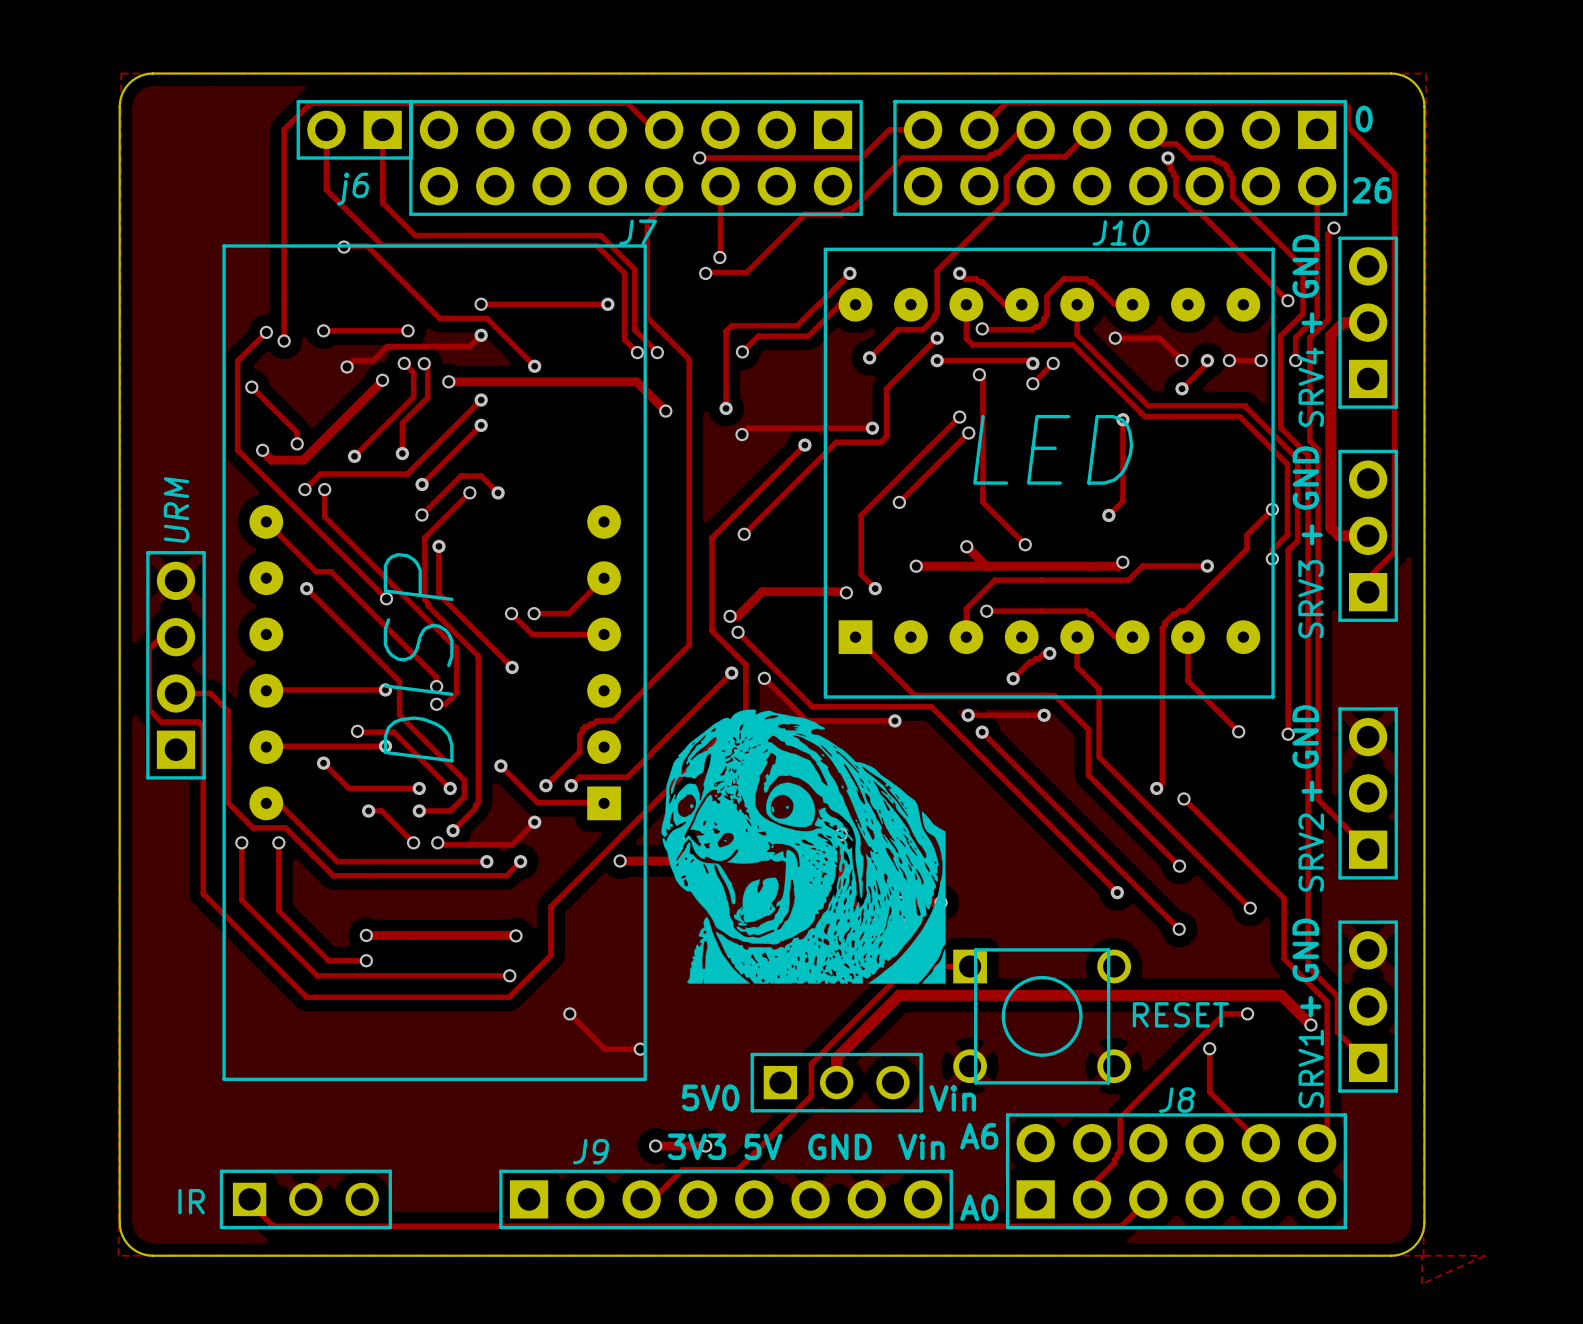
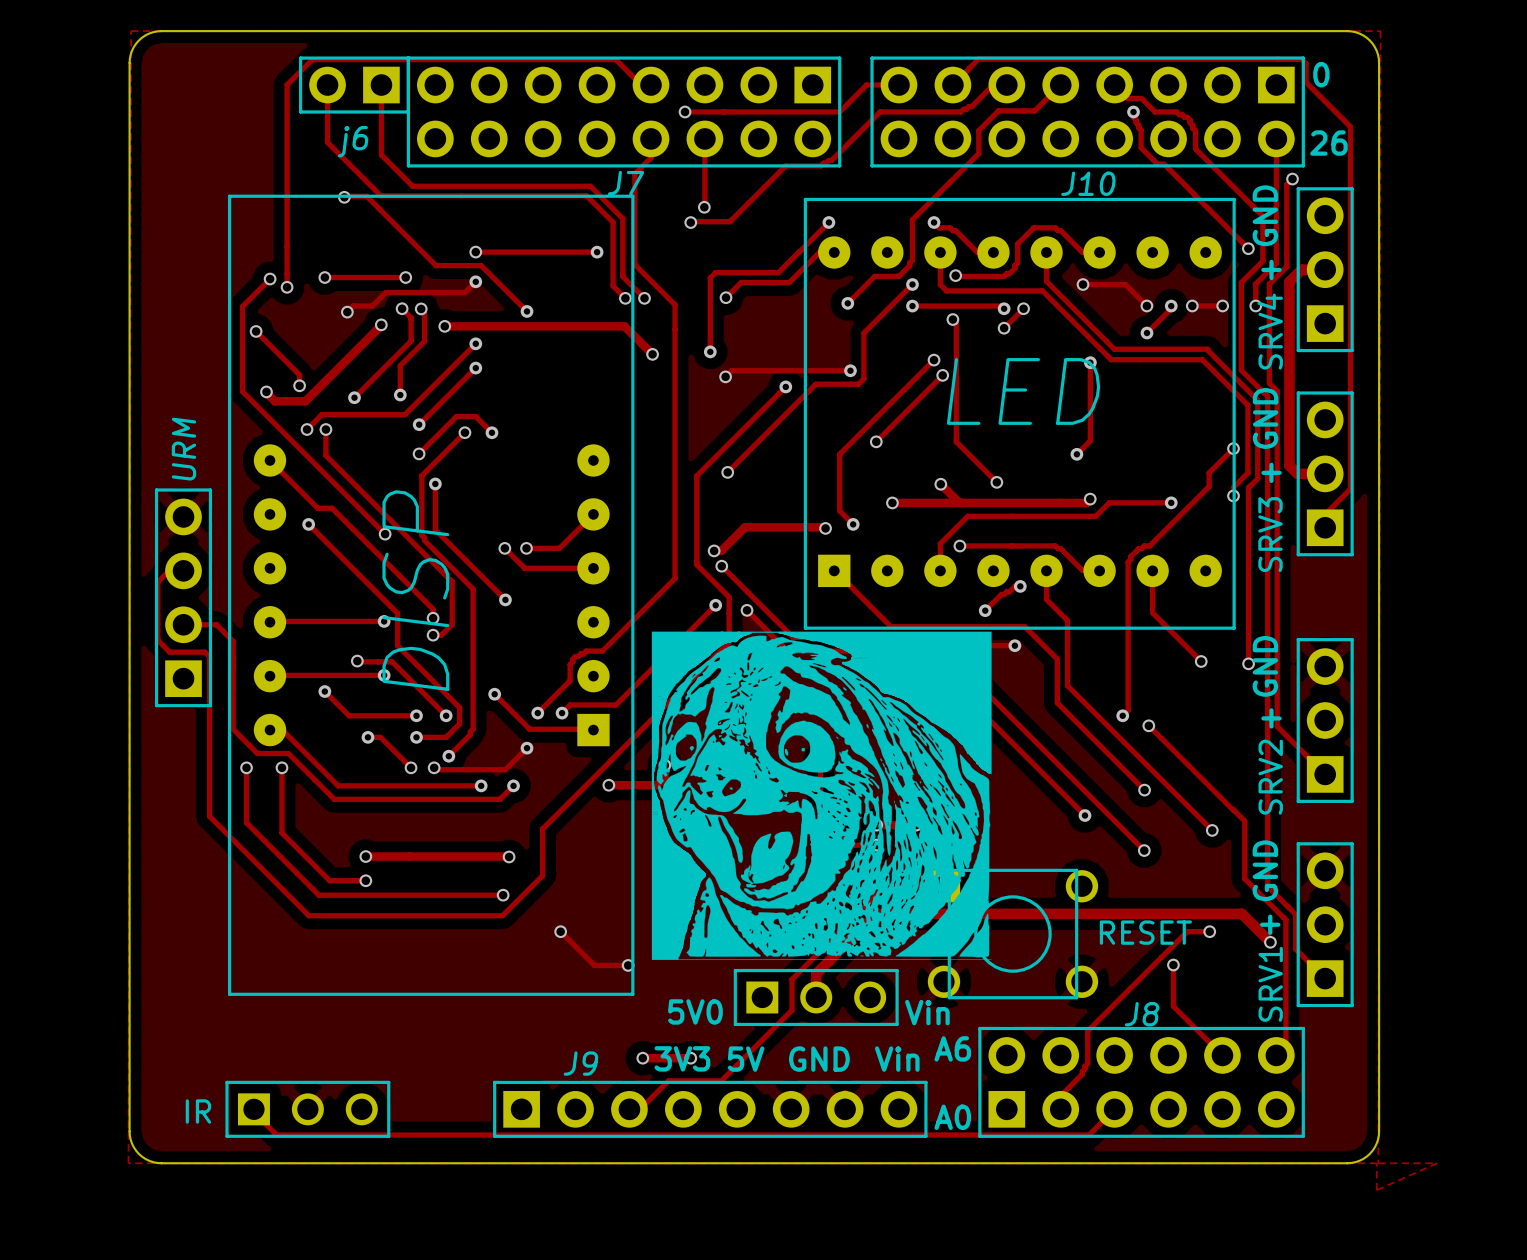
drawing: none -> [651, 631, 992, 961]
drawing: [661, 709, 946, 984] -> none

